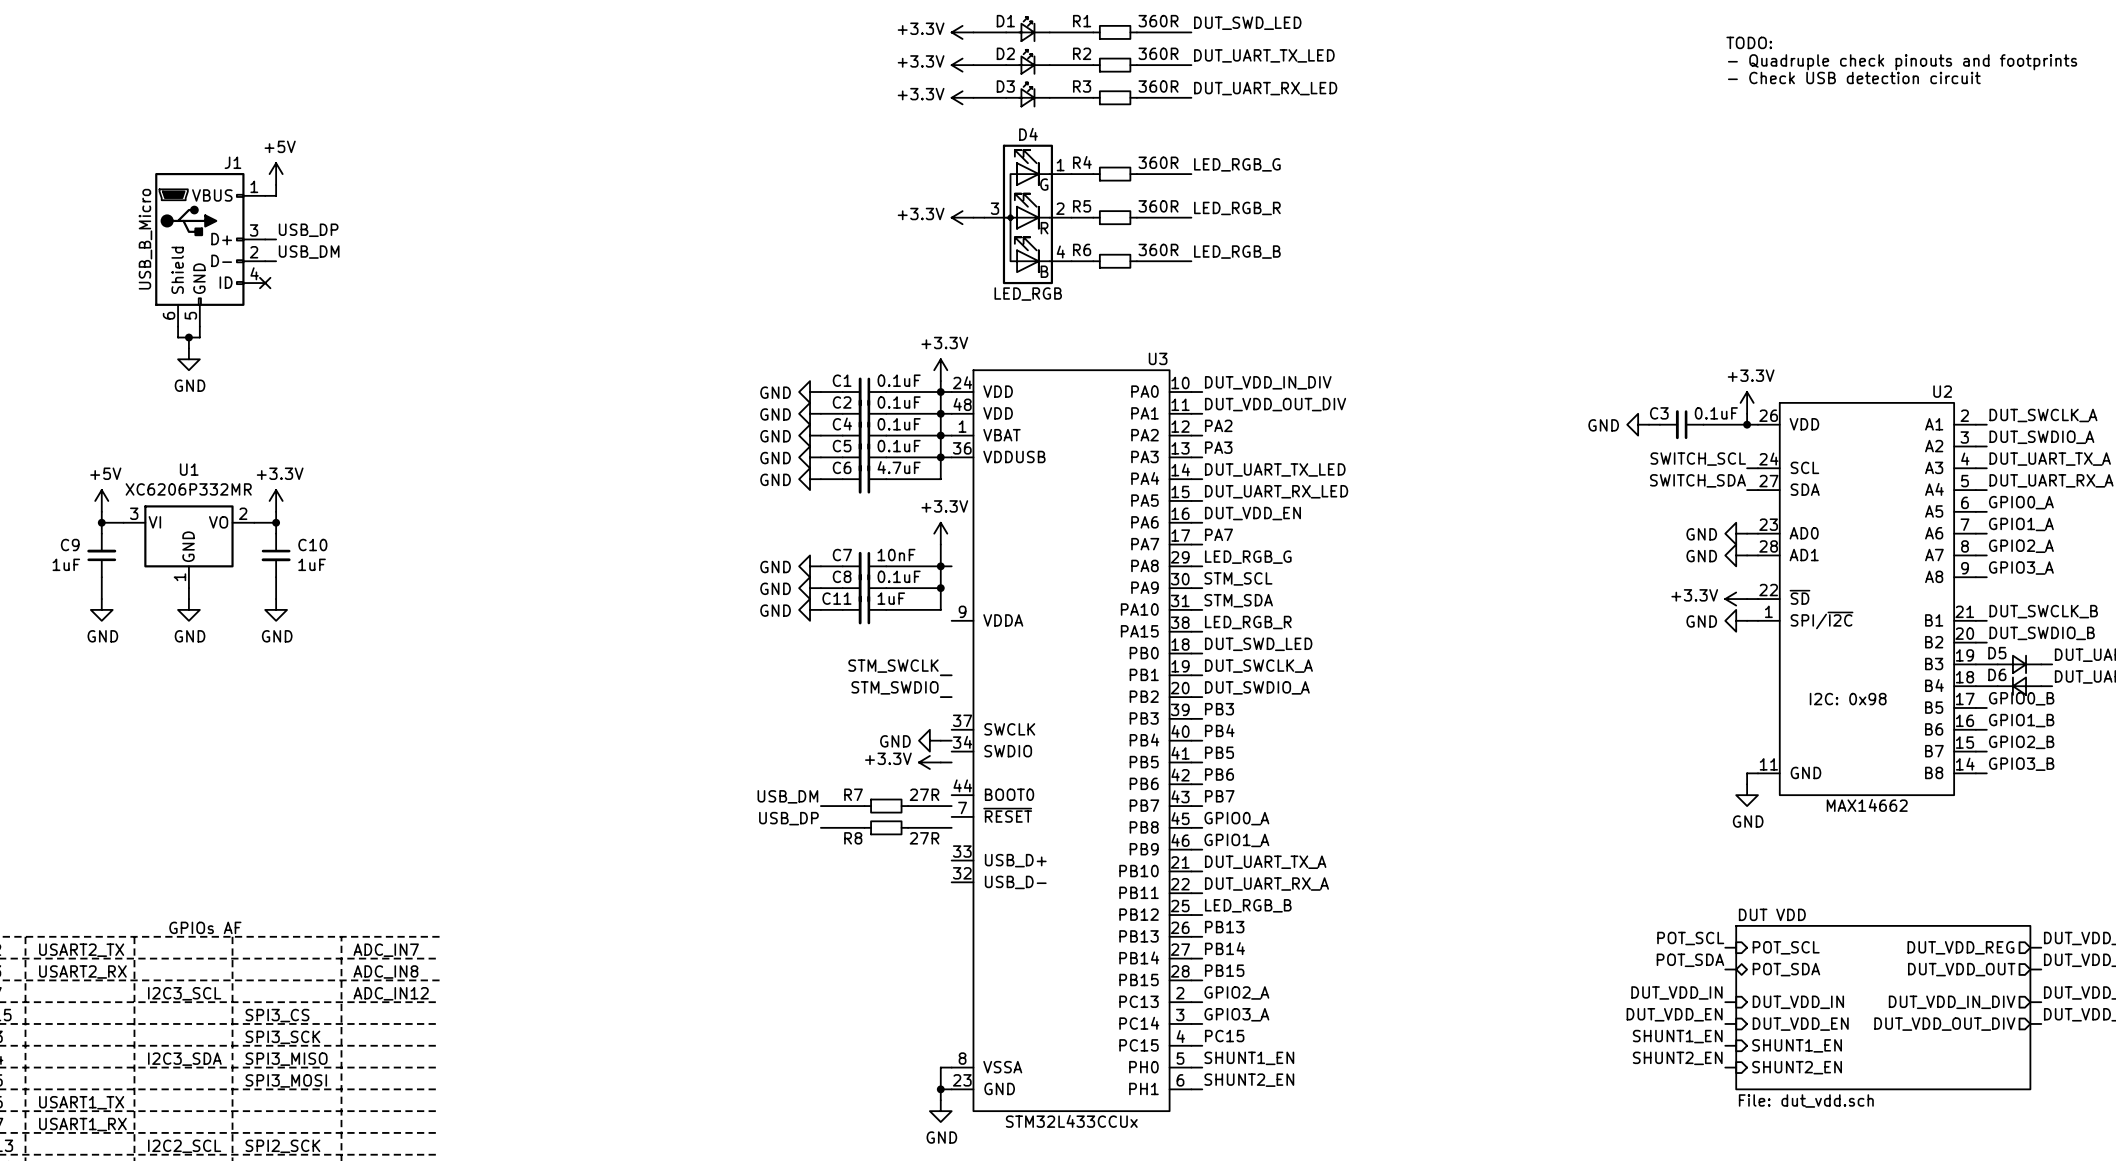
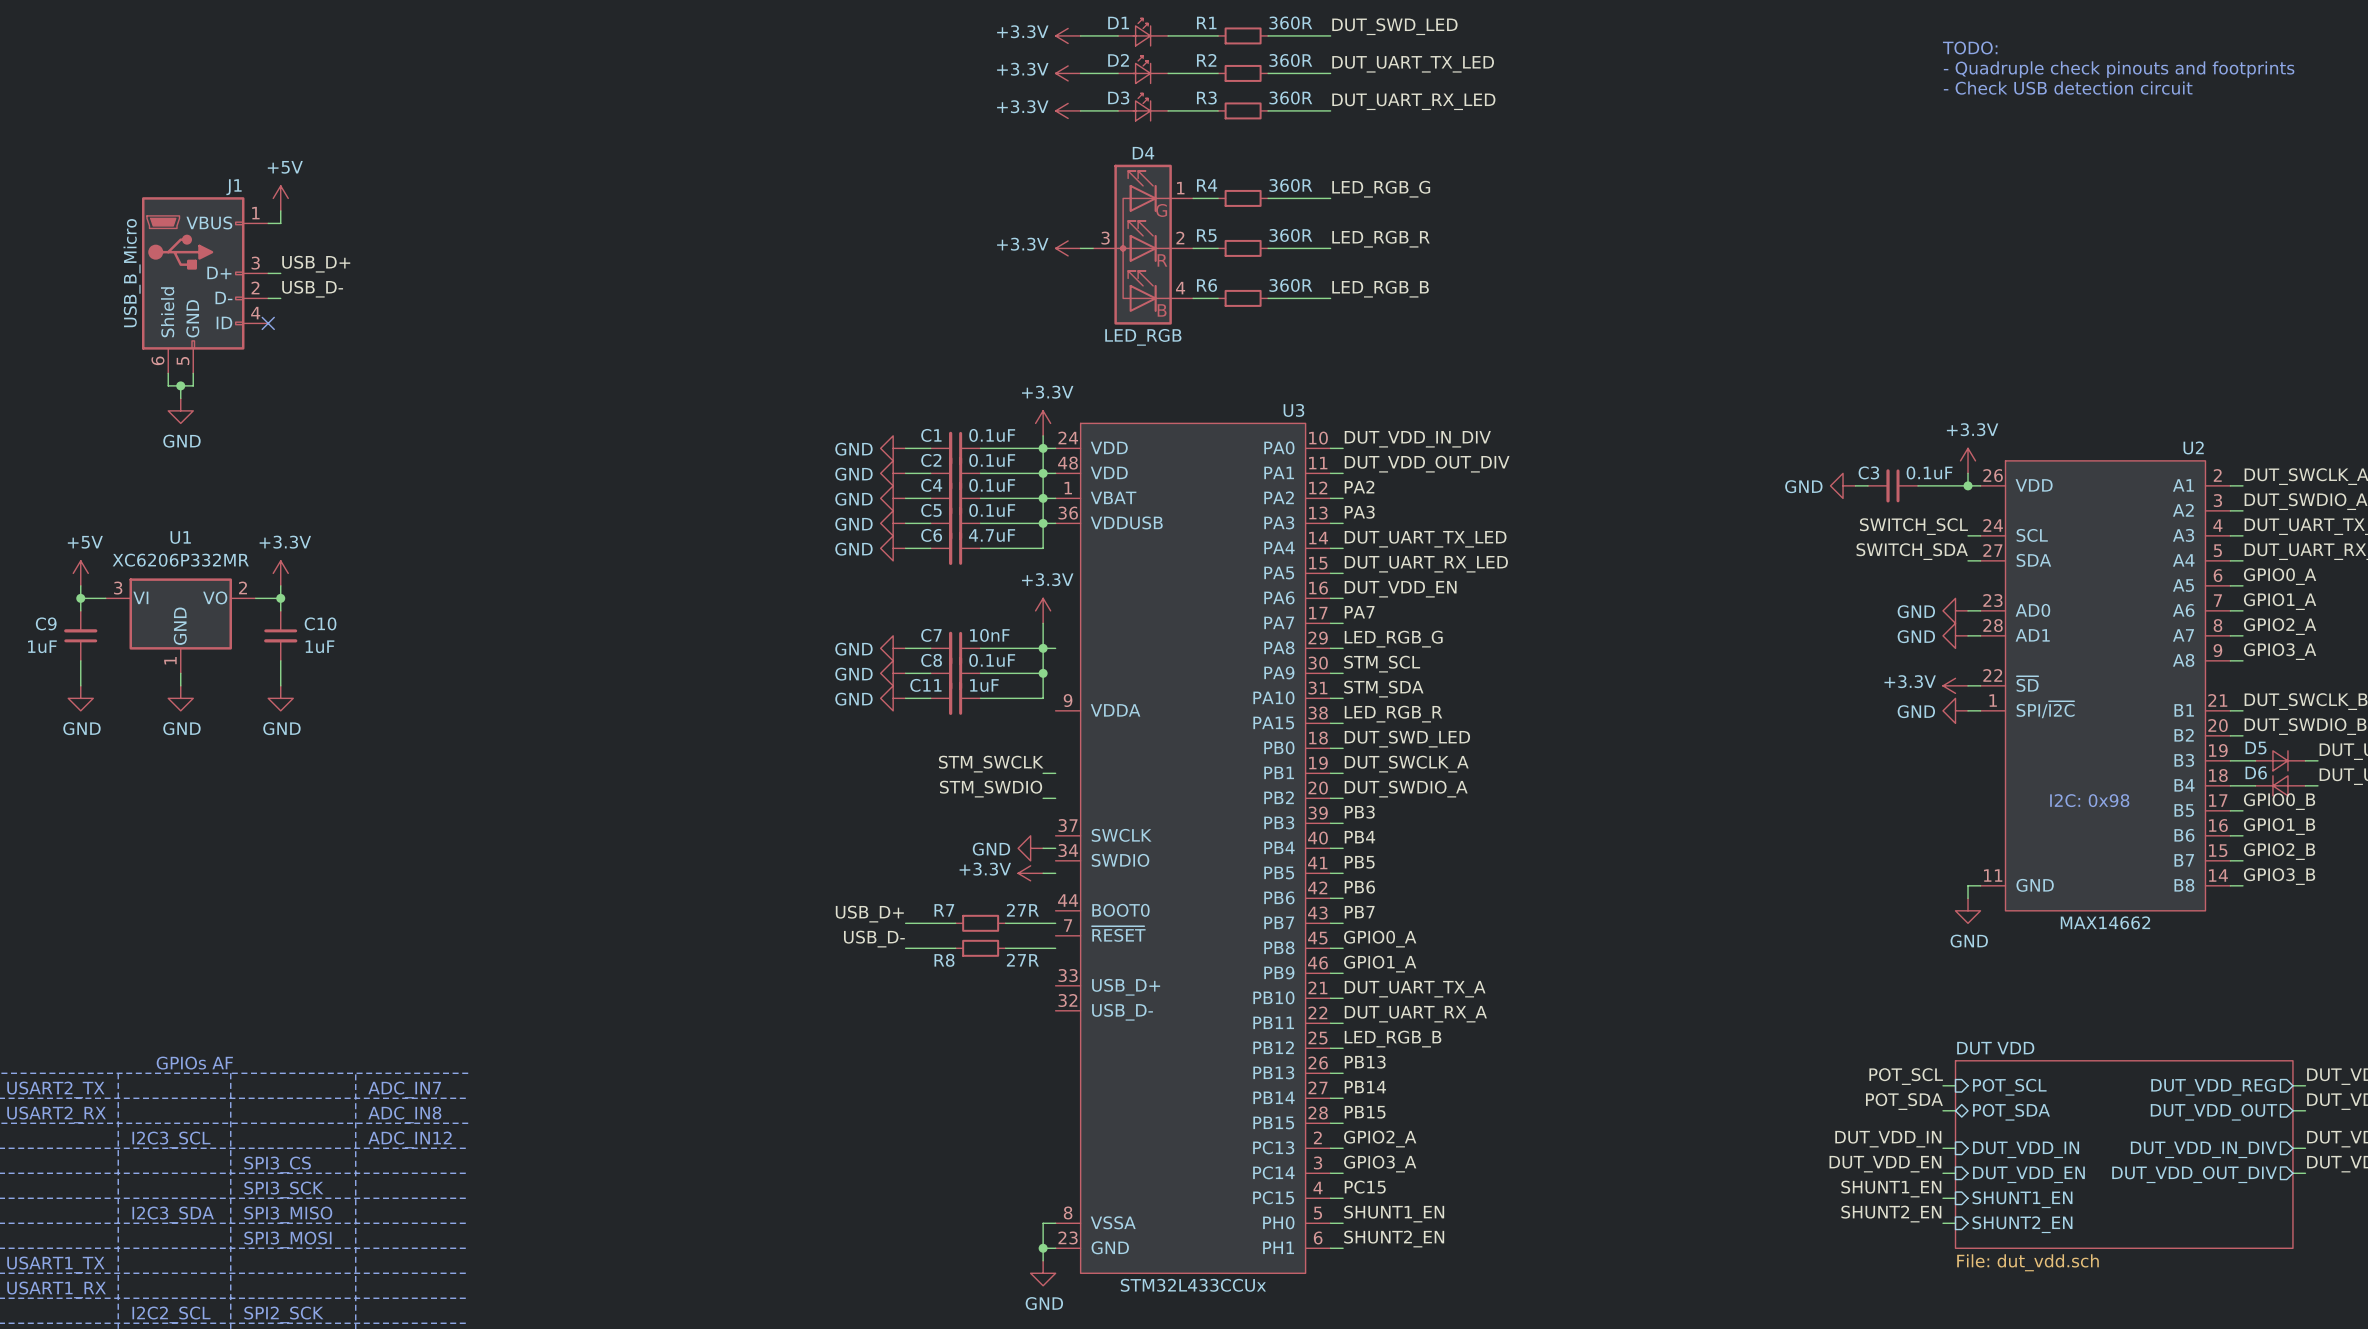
label: USB_DP (308, 230) -> USB_D+ (316, 264)
label: USB_DM (309, 252) -> USB_D- (312, 289)
label: USB_DM (787, 796) -> USB_D+ (869, 914)
label: USB_DP (788, 818) -> USB_D- (874, 939)

